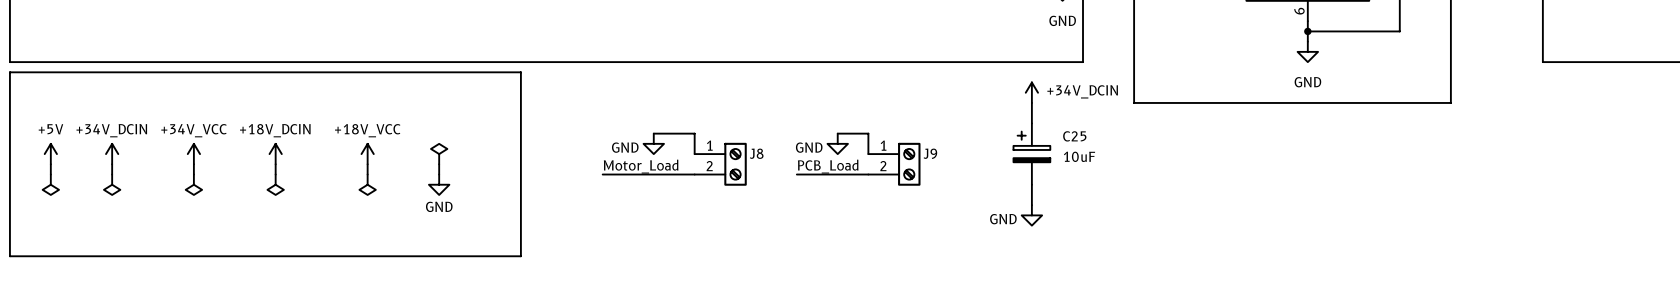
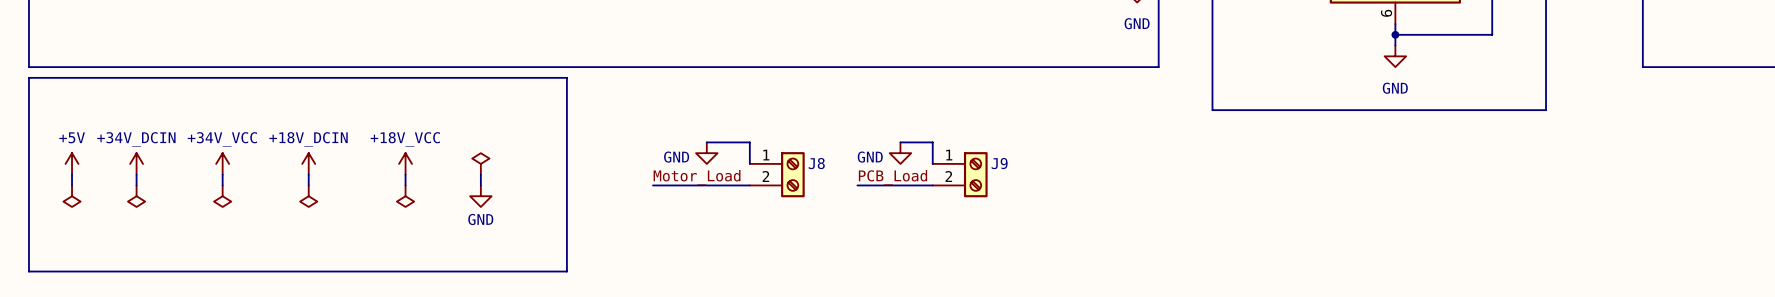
power symbol: +34V_DCIN (1031, 92) -> none
wire: (1031, 102) (1031, 123) -> none
C25: 10uF (1031, 154) -> none
wire: (1031, 184) (1031, 205) -> none
power symbol: GND (1031, 215) -> none

